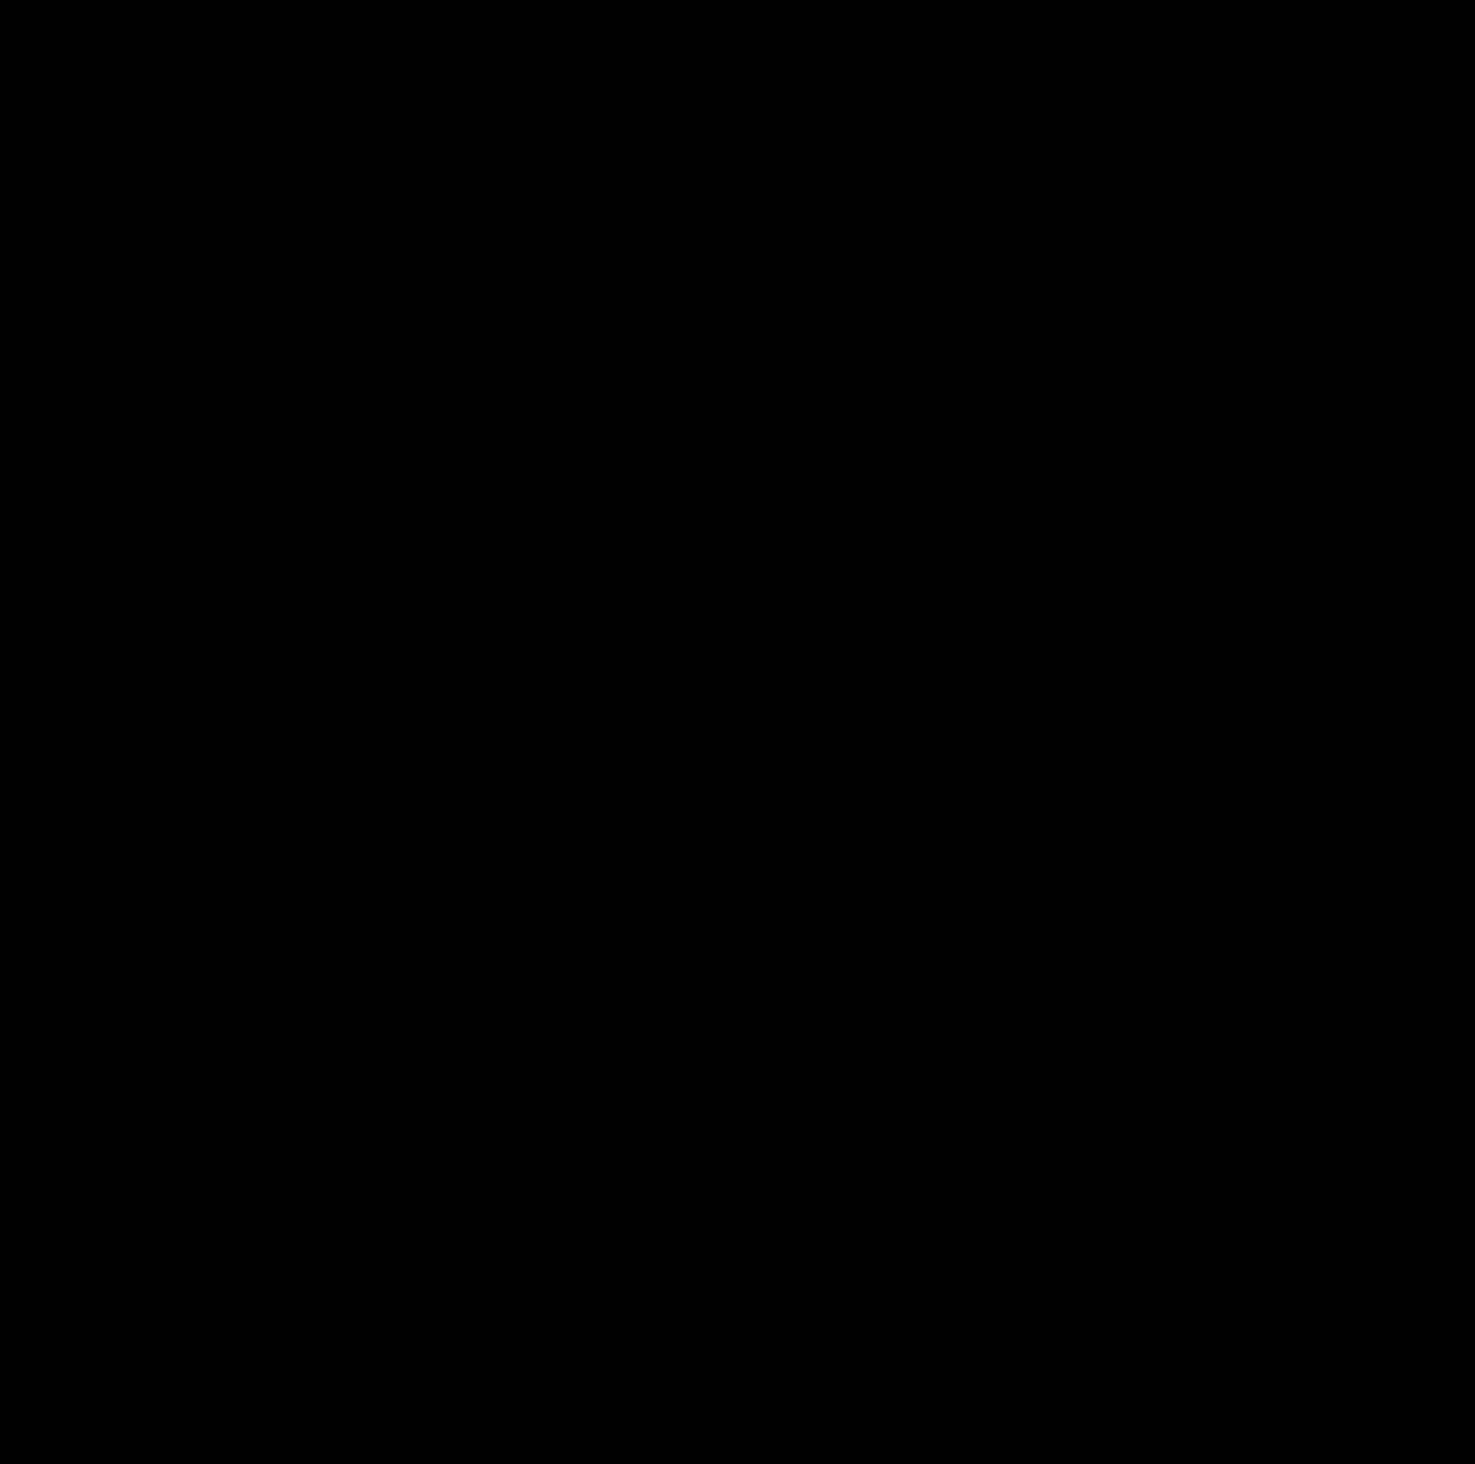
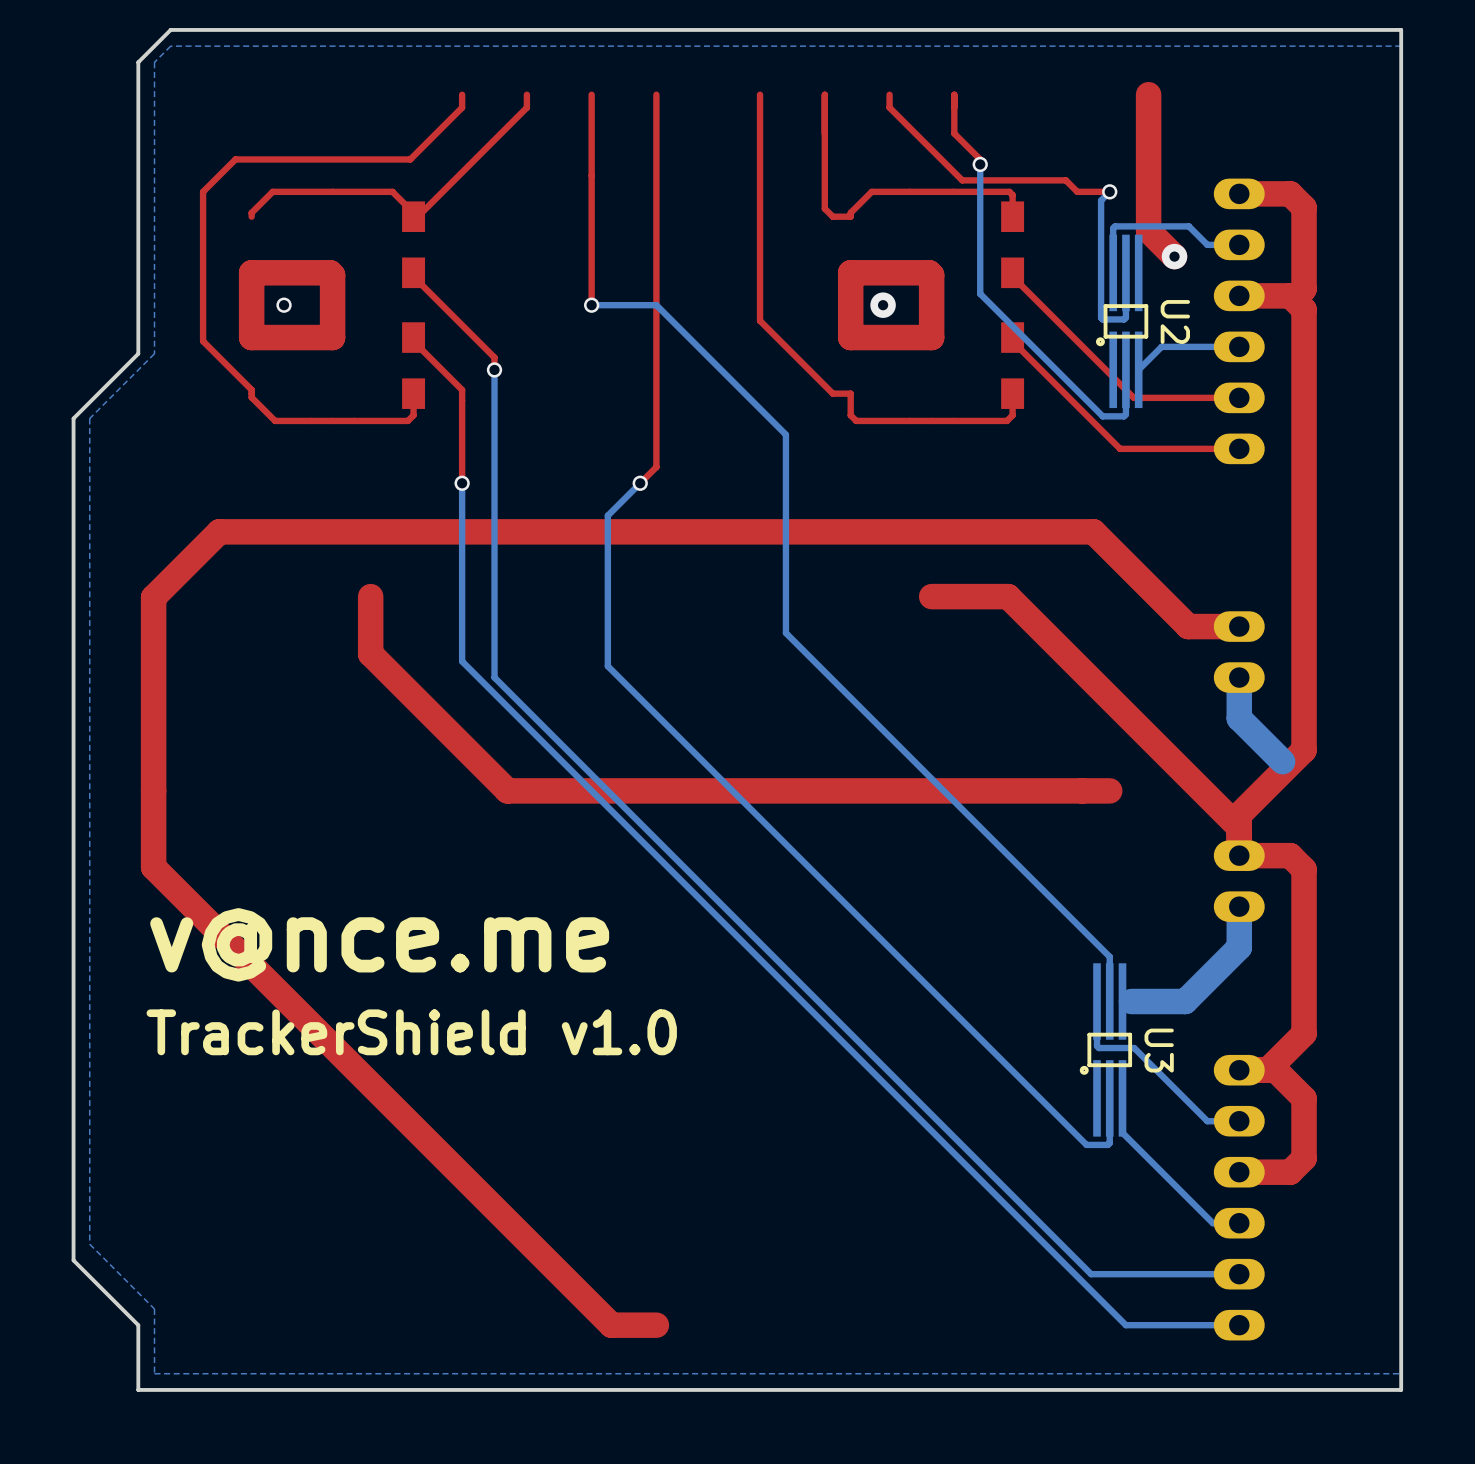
board edge: none -> (1401, 29) (170, 29) (138, 62) (138, 353) (73, 418) (73, 1260) (138, 1325) (138, 1389) (1401, 1389) (1401, 29)
bottom zone outline: none -> (1401, 46) (170, 46) (154, 62) (154, 353) (89, 418) (89, 1244) (154, 1308) (154, 1373) (1401, 1373) (1401, 46)
top track: none -> (462, 94) (462, 107) (410, 159) (235, 159) (203, 191) (203, 341) (251, 389) (251, 397) (275, 420) (407, 420) (413, 415) (413, 393)
top track: none -> (526, 94) (526, 107) (417, 216) (413, 216) (413, 212) (392, 191) (272, 191) (251, 212) (251, 216)
top track: none -> (591, 94) (591, 305)
top track: none -> (656, 94) (656, 467) (640, 483)
top track: none -> (760, 94) (760, 320) (832, 393) (850, 393) (850, 415) (856, 420) (1007, 420) (1012, 415) (1012, 393)
top track: none -> (824, 94) (824, 208) (832, 216) (850, 216) (850, 212) (871, 191) (1009, 191) (1012, 195) (1012, 216)
top track: none -> (889, 94) (889, 107) (962, 180) (1065, 180) (1077, 191) (1109, 191)
top track: none -> (954, 94) (954, 133) (980, 159) (980, 164)
top track: none -> (1148, 94) (1148, 230) (1174, 256)
bottom track: none -> (980, 164) (980, 293) (1102, 416) (1124, 416) (1125, 414) (1125, 369)
via: none -> (980, 164)
bottom track: none -> (1109, 191) (1101, 200) (1101, 317) (1102, 319) (1124, 319) (1125, 317) (1125, 272)
via: none -> (1109, 191)
top track: none -> (1239, 193) (1290, 193) (1304, 207) (1304, 288) (1297, 295) (1239, 295)
part: none -> (413, 244)
part: none -> (1012, 244)
bottom track: none -> (1239, 244) (1207, 244) (1188, 226) (1115, 226) (1113, 228) (1113, 272)
via: none -> (1174, 256)
top track: none -> (330, 272) (251, 272) (251, 337) (332, 337) (332, 275) (330, 272)
top track: none -> (413, 272) (413, 276) (494, 357) (494, 369)
top track: none -> (929, 272) (850, 272) (850, 337) (931, 337) (931, 275) (929, 272)
top track: none -> (1012, 272) (1012, 276) (1133, 397) (1239, 397)
top track: none -> (1290, 295) (1304, 309) (1304, 750) (1239, 814) (1239, 855) (1290, 855) (1304, 869) (1304, 1033) (1267, 1070)
via: none -> (284, 305)
bottom track: none -> (591, 305) (656, 305) (785, 434) (785, 633) (1109, 956) (1109, 1001)
via: none -> (591, 305)
via: none -> (883, 305)
U2: none -> (1122, 321)
part: none -> (1239, 321)
top track: none -> (413, 337) (413, 341) (462, 389) (462, 483)
top track: none -> (1012, 337) (1012, 341) (1120, 448) (1239, 448)
bottom track: none -> (1239, 346) (1161, 346) (1138, 369)
part: none -> (413, 365)
part: none -> (1012, 365)
bottom track: none -> (494, 369) (494, 677) (1091, 1274) (1239, 1274)
via: none -> (494, 369)
bottom track: none -> (462, 483) (462, 661) (1125, 1325) (1239, 1325)
via: none -> (462, 483)
bottom track: none -> (640, 483) (607, 515) (607, 666) (1086, 1144) (1107, 1144) (1109, 1143) (1109, 1098)
via: none -> (640, 483)
top track: none -> (370, 596) (370, 653) (507, 790) (1109, 790)
top track: none -> (931, 596) (1008, 596) (1239, 827)
top track: none -> (1239, 626) (1188, 626) (1093, 531) (219, 531) (153, 597) (153, 867) (611, 1325) (656, 1325)
part: none -> (1239, 652)
bottom track: none -> (1239, 677) (1239, 718) (1282, 761)
part: none -> (1239, 881)
bottom track: none -> (1245, 906) (1239, 906) (1239, 947) (1185, 1001) (1131, 1001)
text: none -> v@nce.me (379, 944)
bottom track: none -> (1097, 1001) (1097, 1046) (1098, 1048) (1134, 1048) (1207, 1121) (1239, 1121)
text: none -> TrackerShield v1.0 (411, 1032)
U3: none -> (1105, 1049)
top track: none -> (1239, 1070) (1275, 1070) (1304, 1098) (1304, 1158) (1290, 1172) (1239, 1172)
bottom track: none -> (1122, 1098) (1122, 1132) (1212, 1223) (1239, 1223)
part: none -> (1239, 1197)

